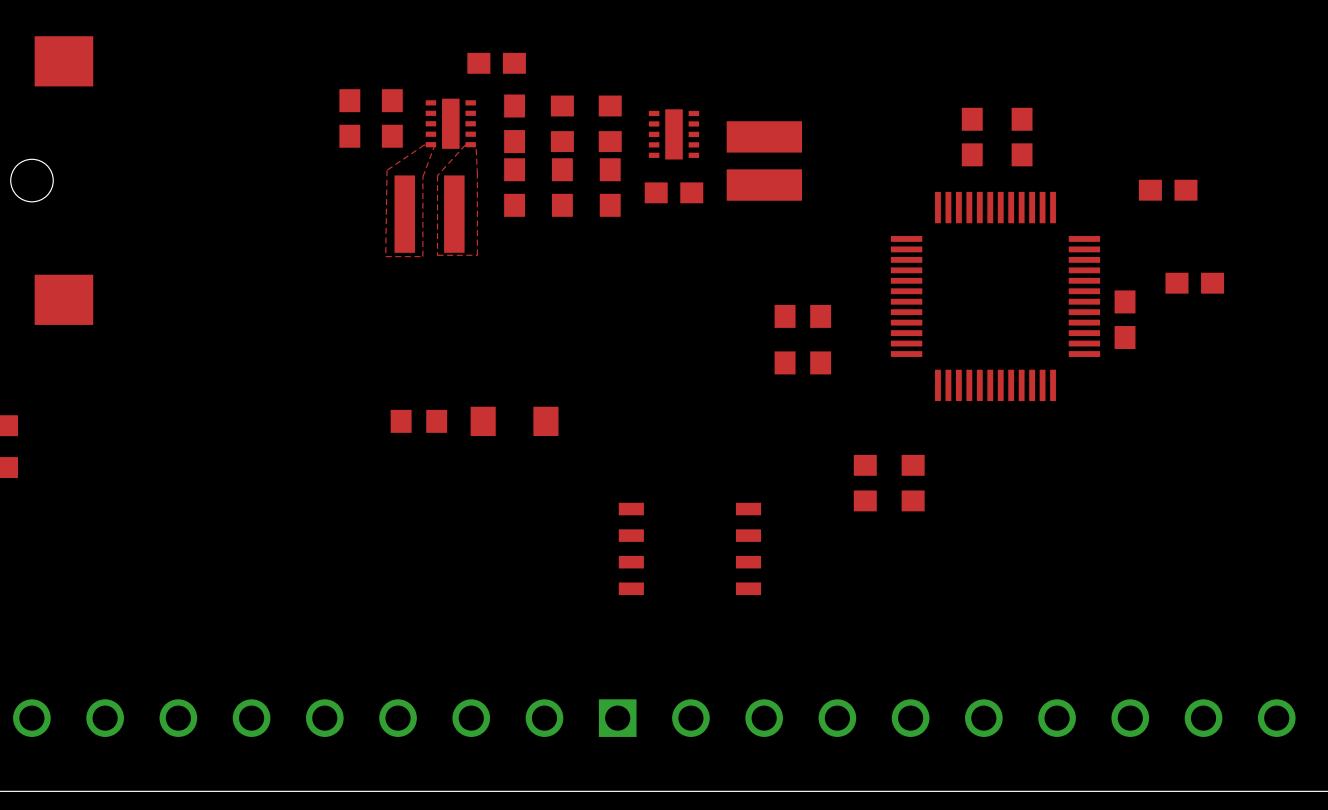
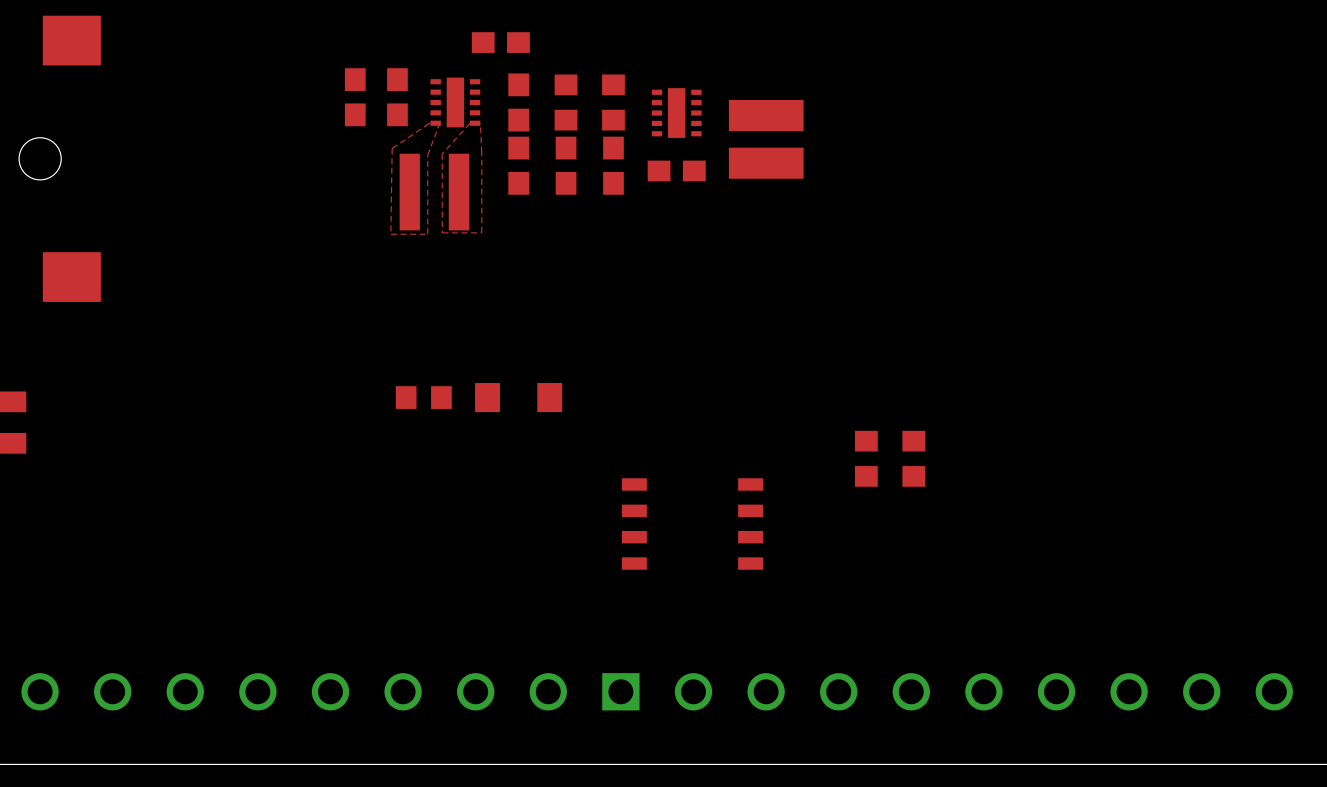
part: (972, 137) -> none
part: (1022, 137) -> none
part: (1168, 190) -> none
part: (1194, 283) -> none
part: (995, 296) -> none
part: (802, 316) -> none
part: (1125, 319) -> none
part: (802, 362) -> none

